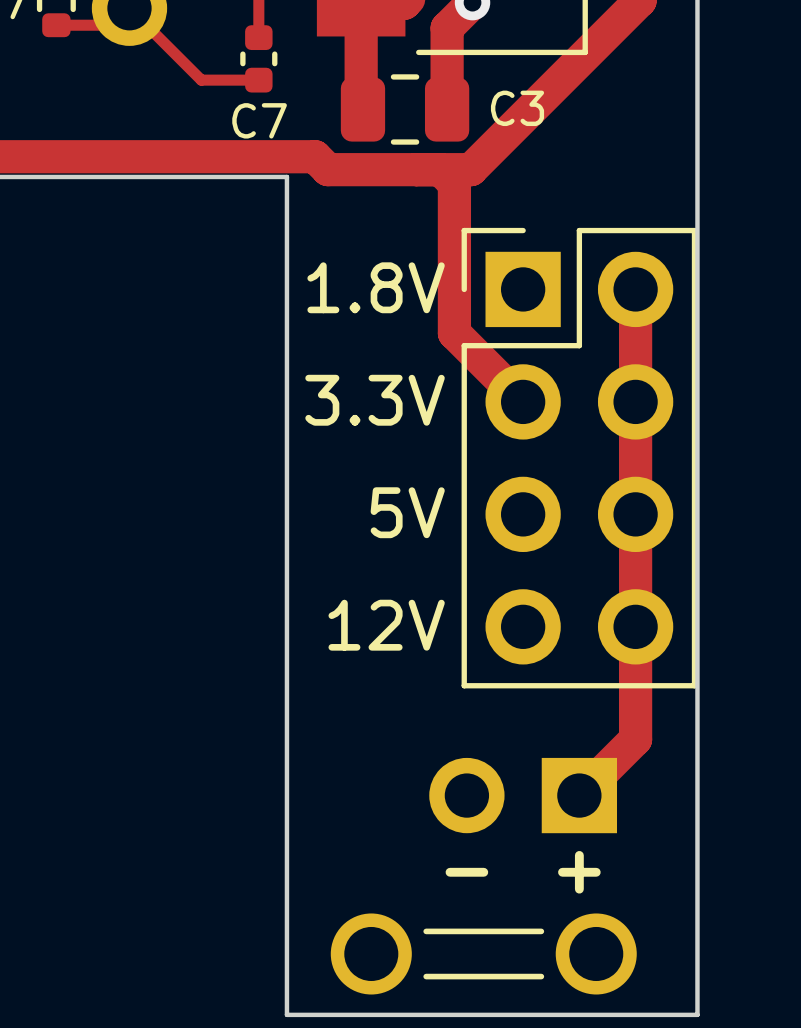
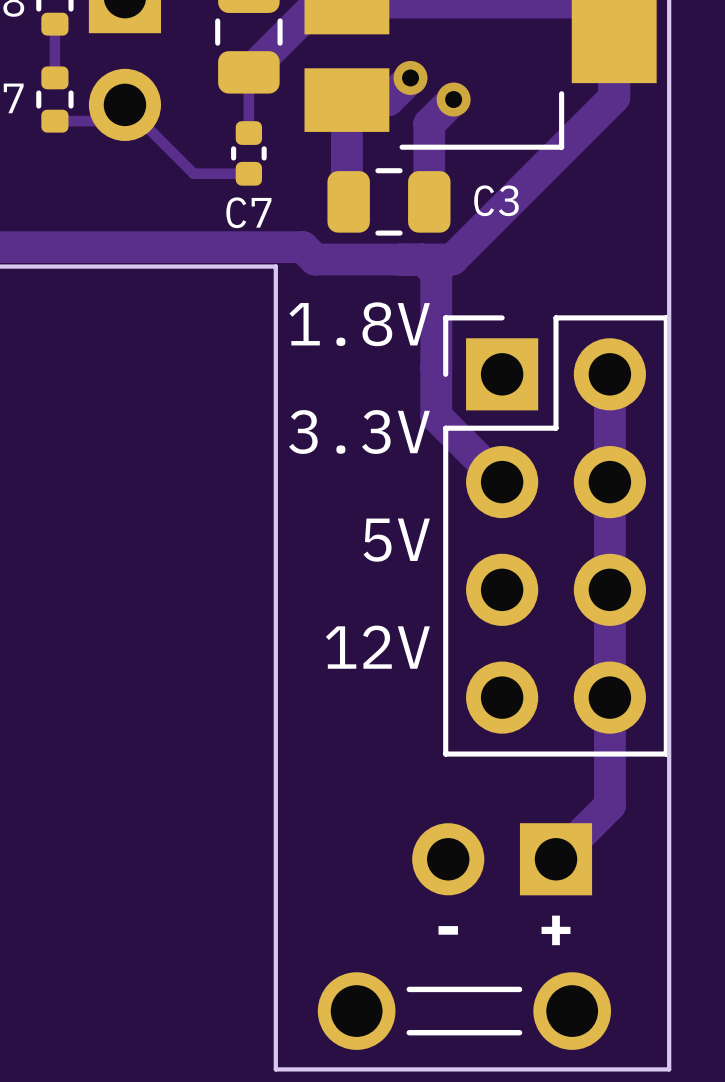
text position: 1.8V (376, 287) -> 1.8V (359, 324)
text position: 3.3V (375, 400) -> 3.3V (359, 432)
text position: 5V (407, 512) -> 5V (396, 540)
text position: 12V (386, 625) -> 12V (377, 647)

